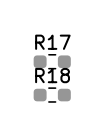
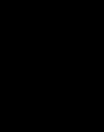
R17: (52, 61) -> none
R18: (52, 95) -> none

